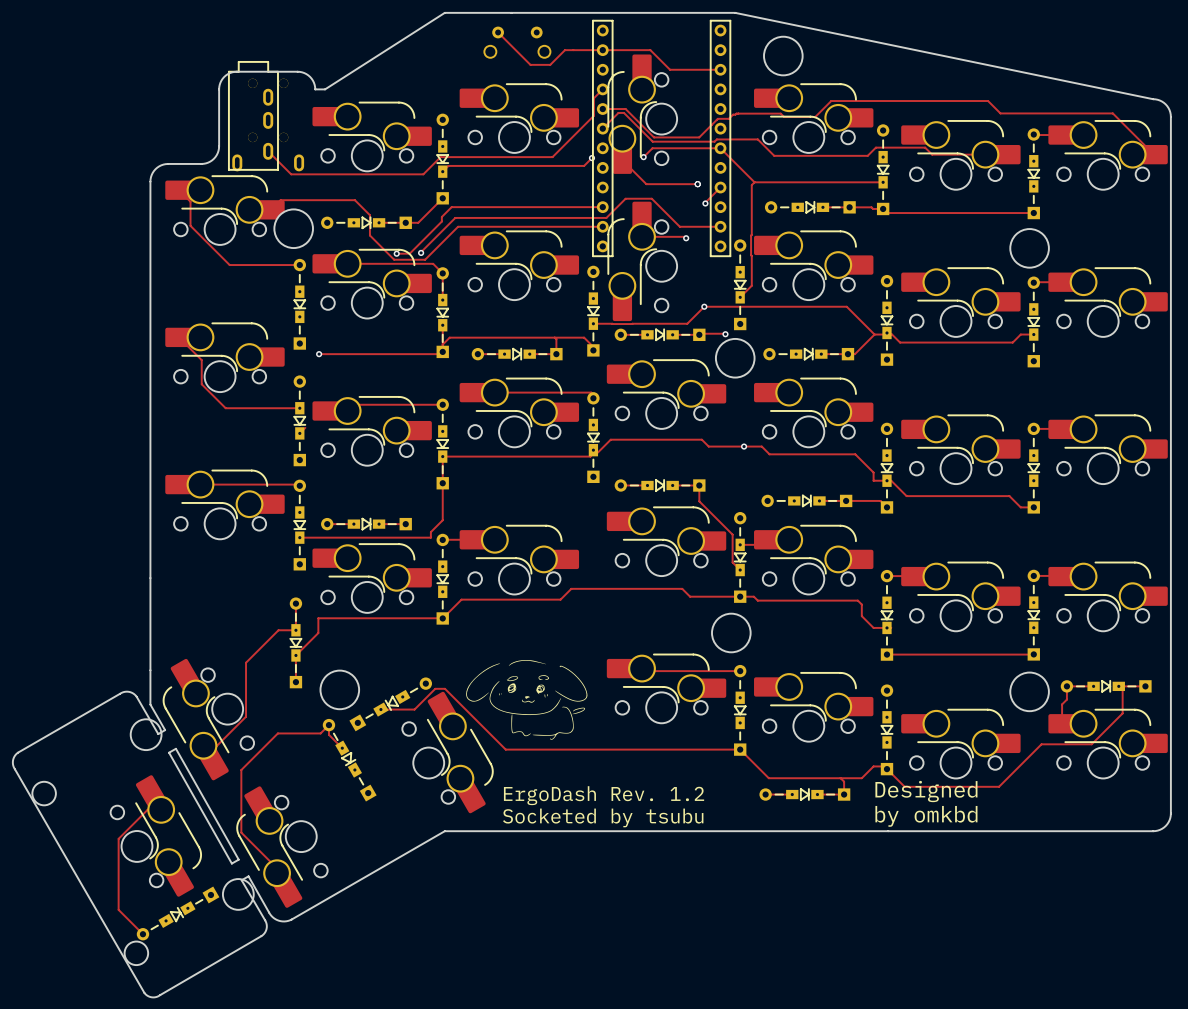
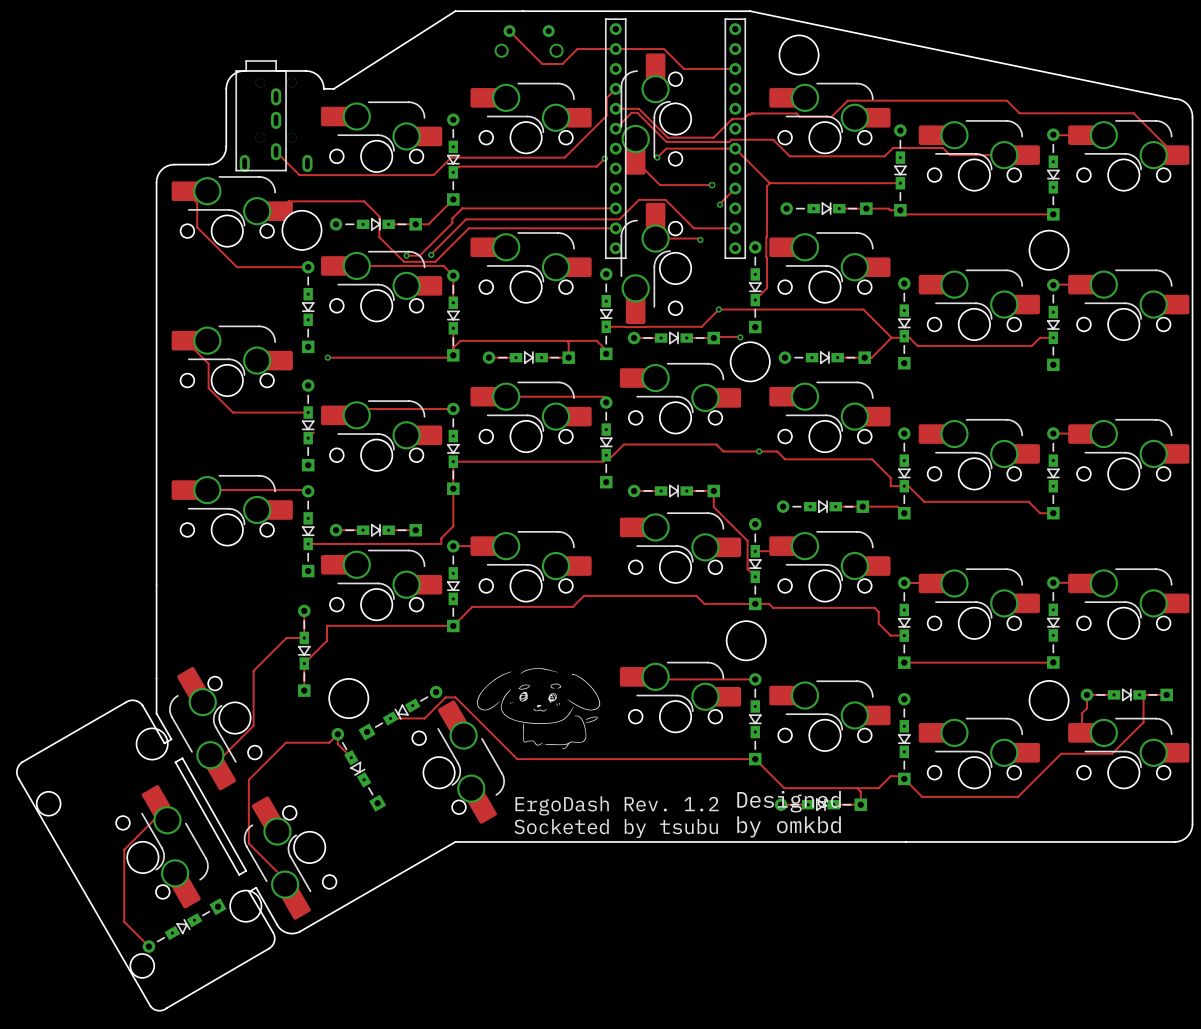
text position: Designed (926, 791) -> Designed (789, 801)
text position: by omkbd (926, 816) -> by omkbd (789, 826)

